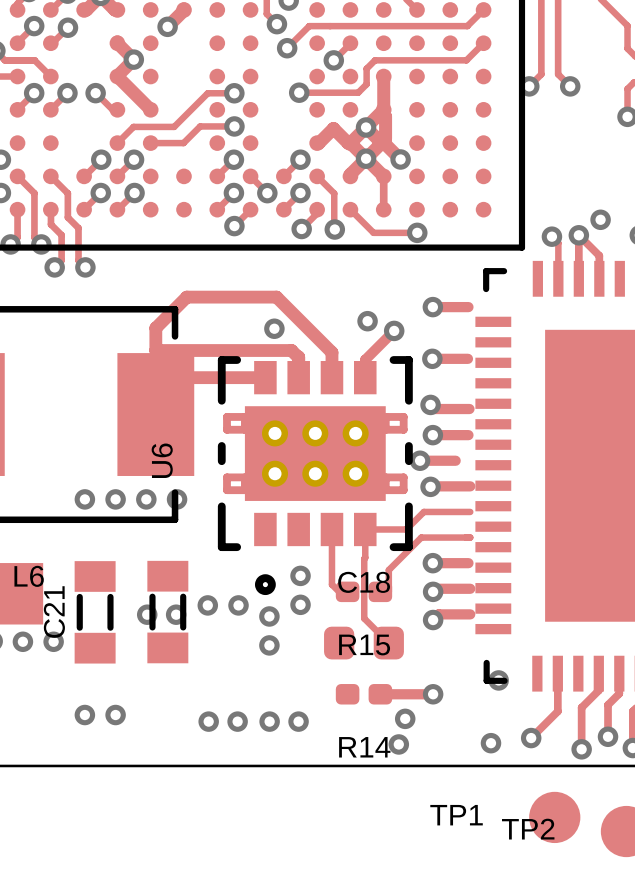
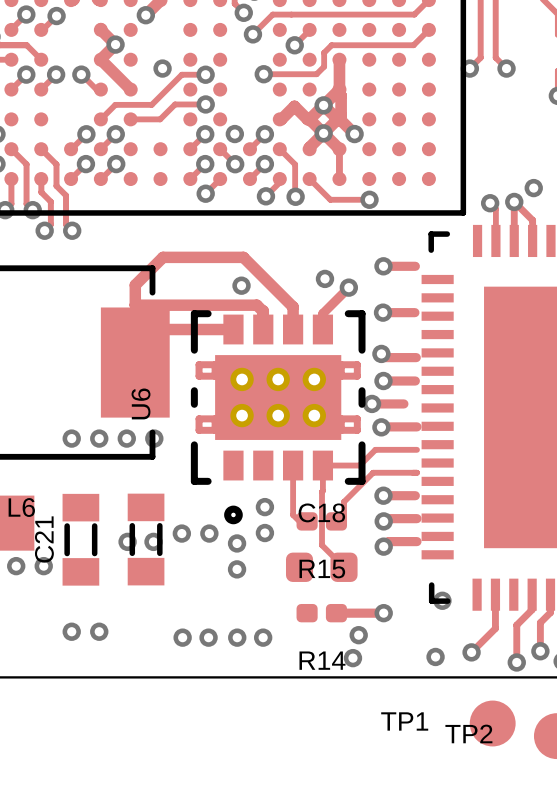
via: none -> (162, 68)
via: none -> (234, 134)

